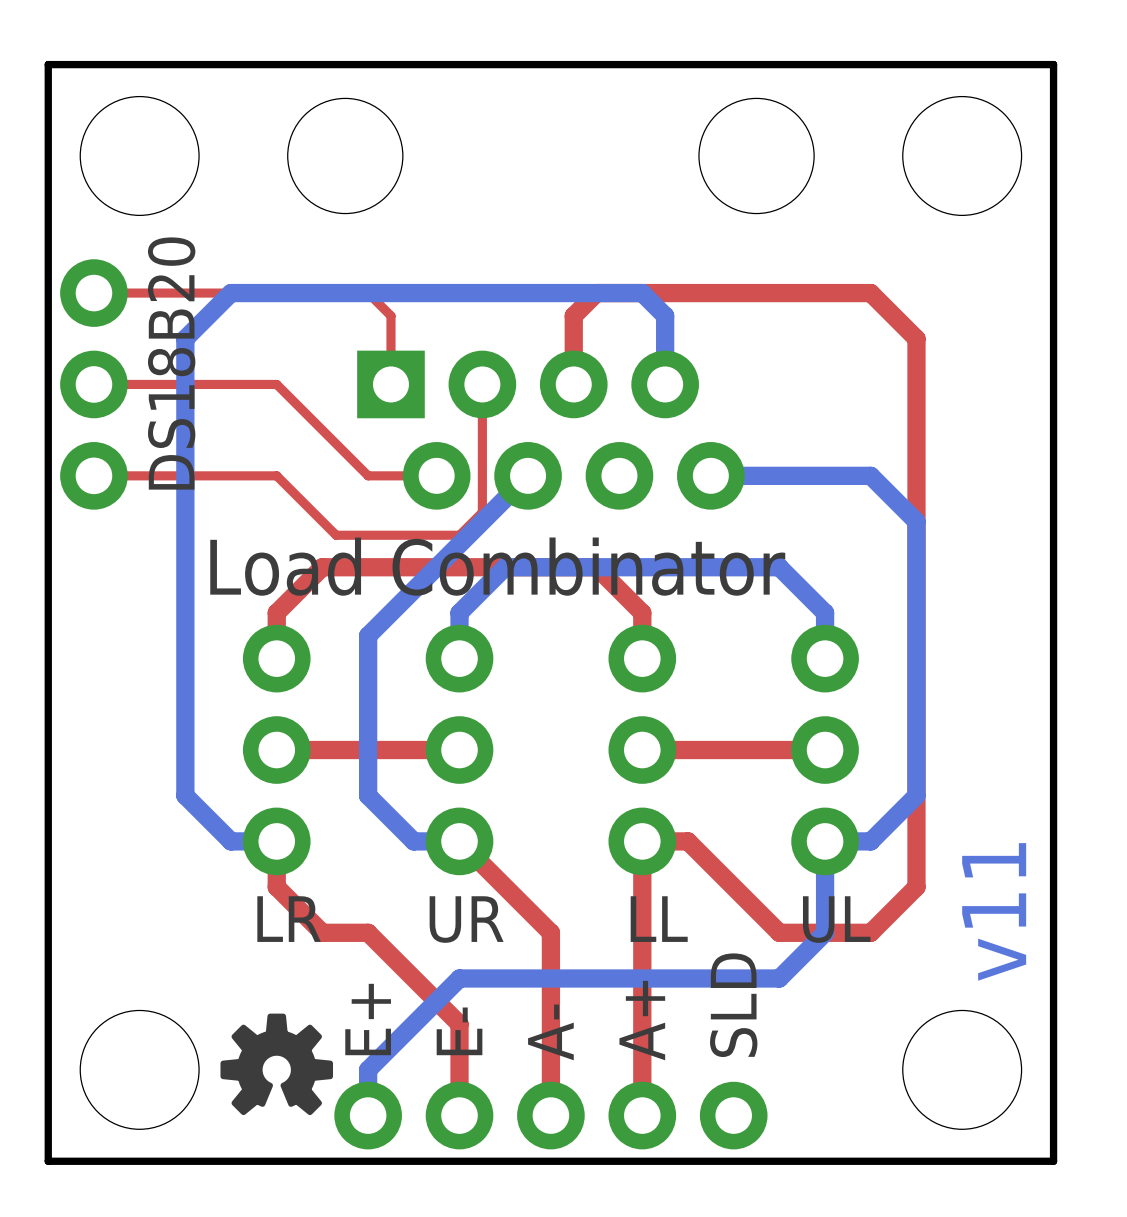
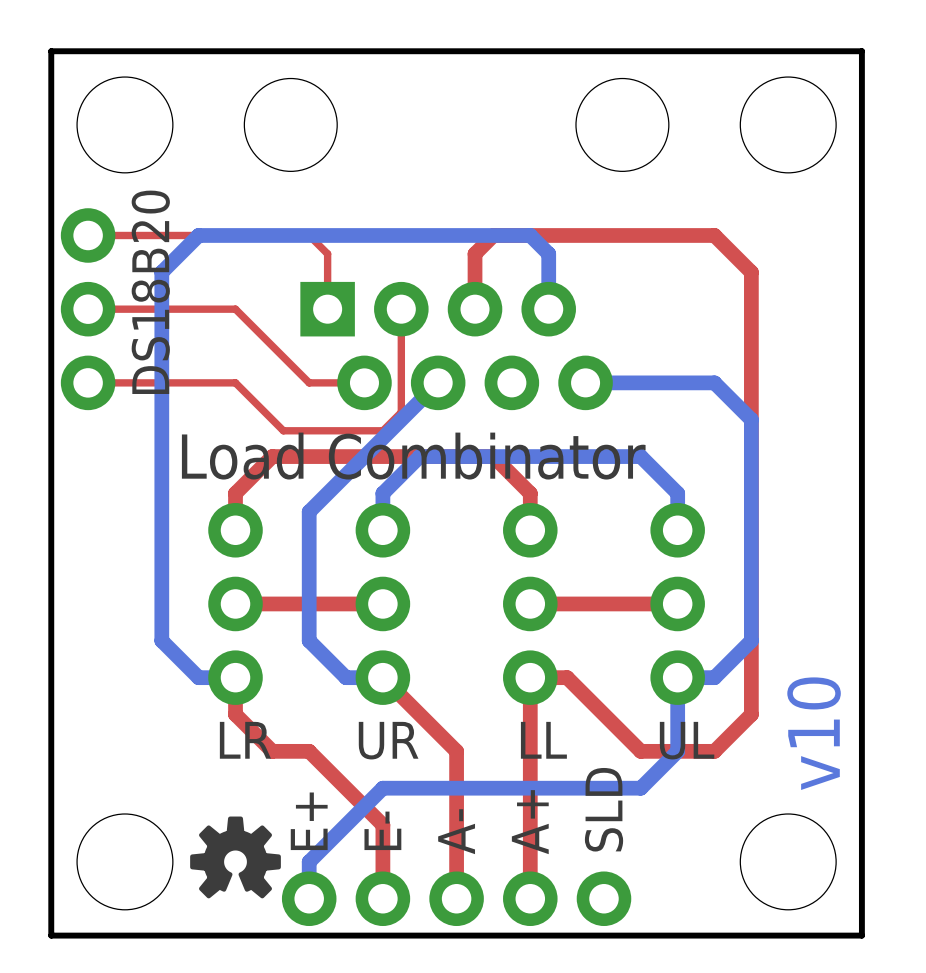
text: v11 (994, 911) -> v10 (814, 733)

